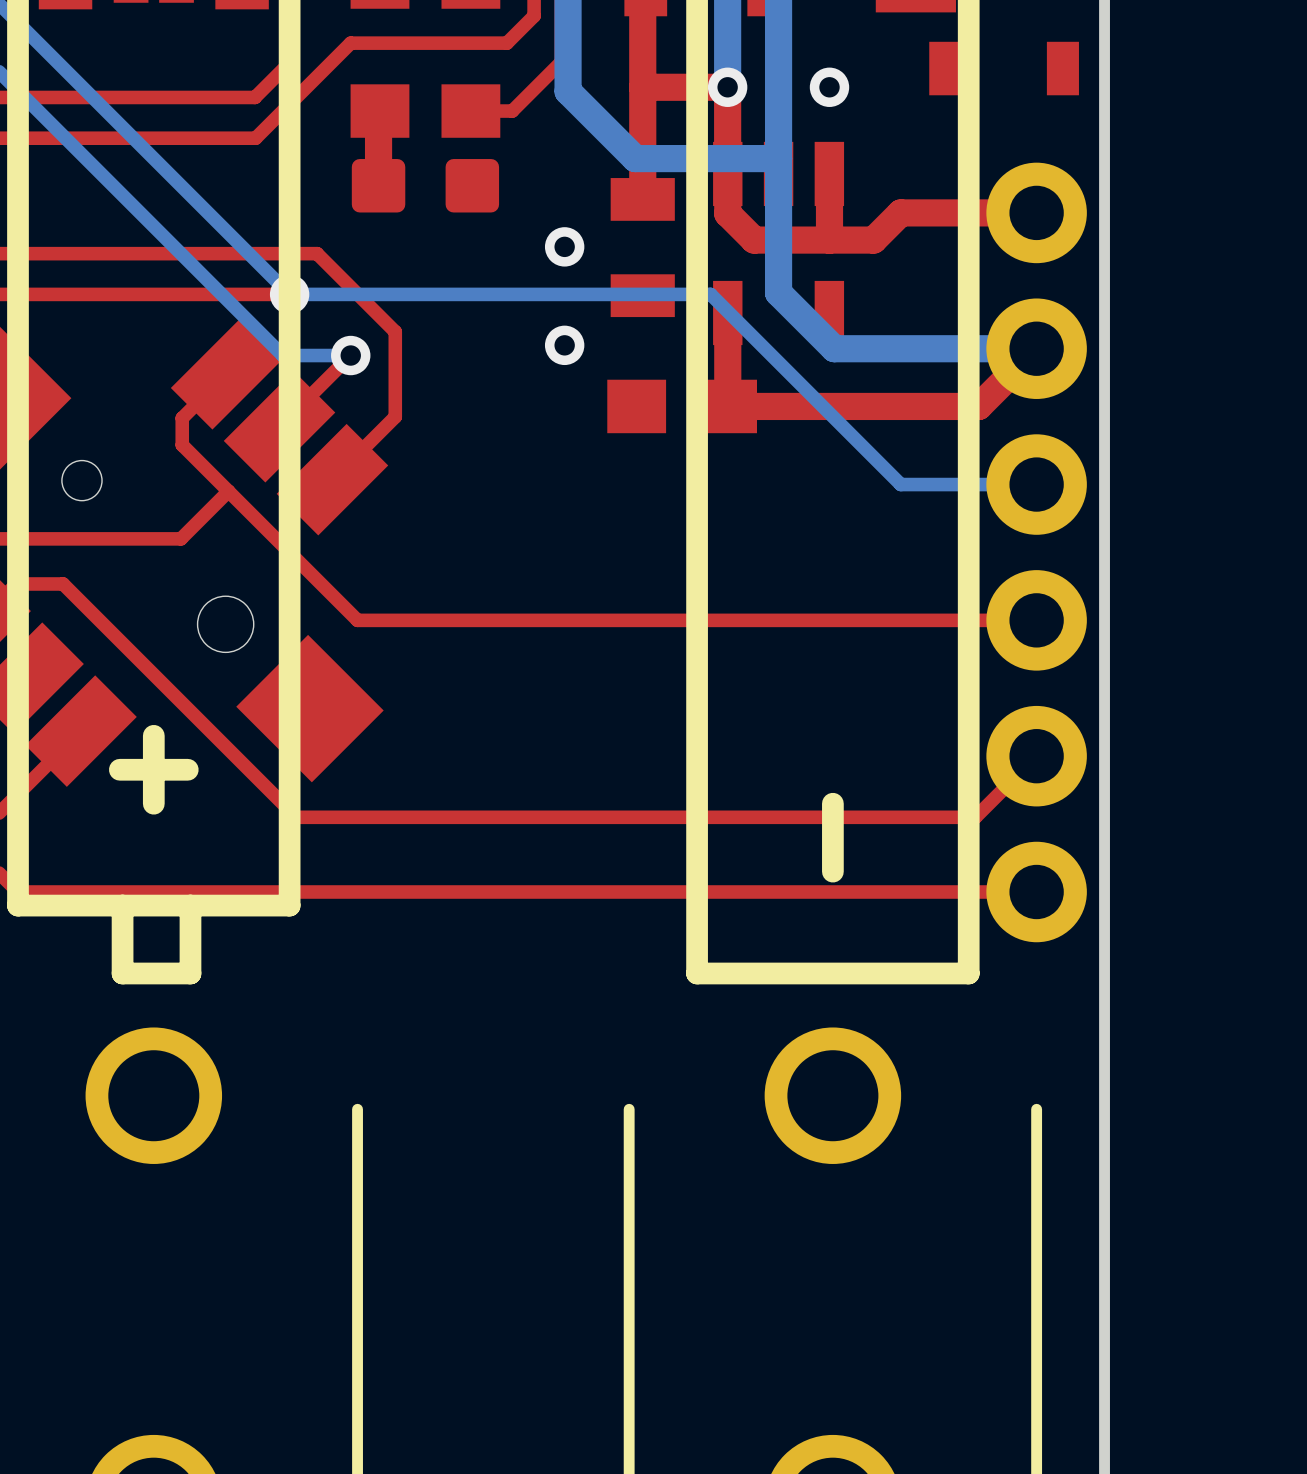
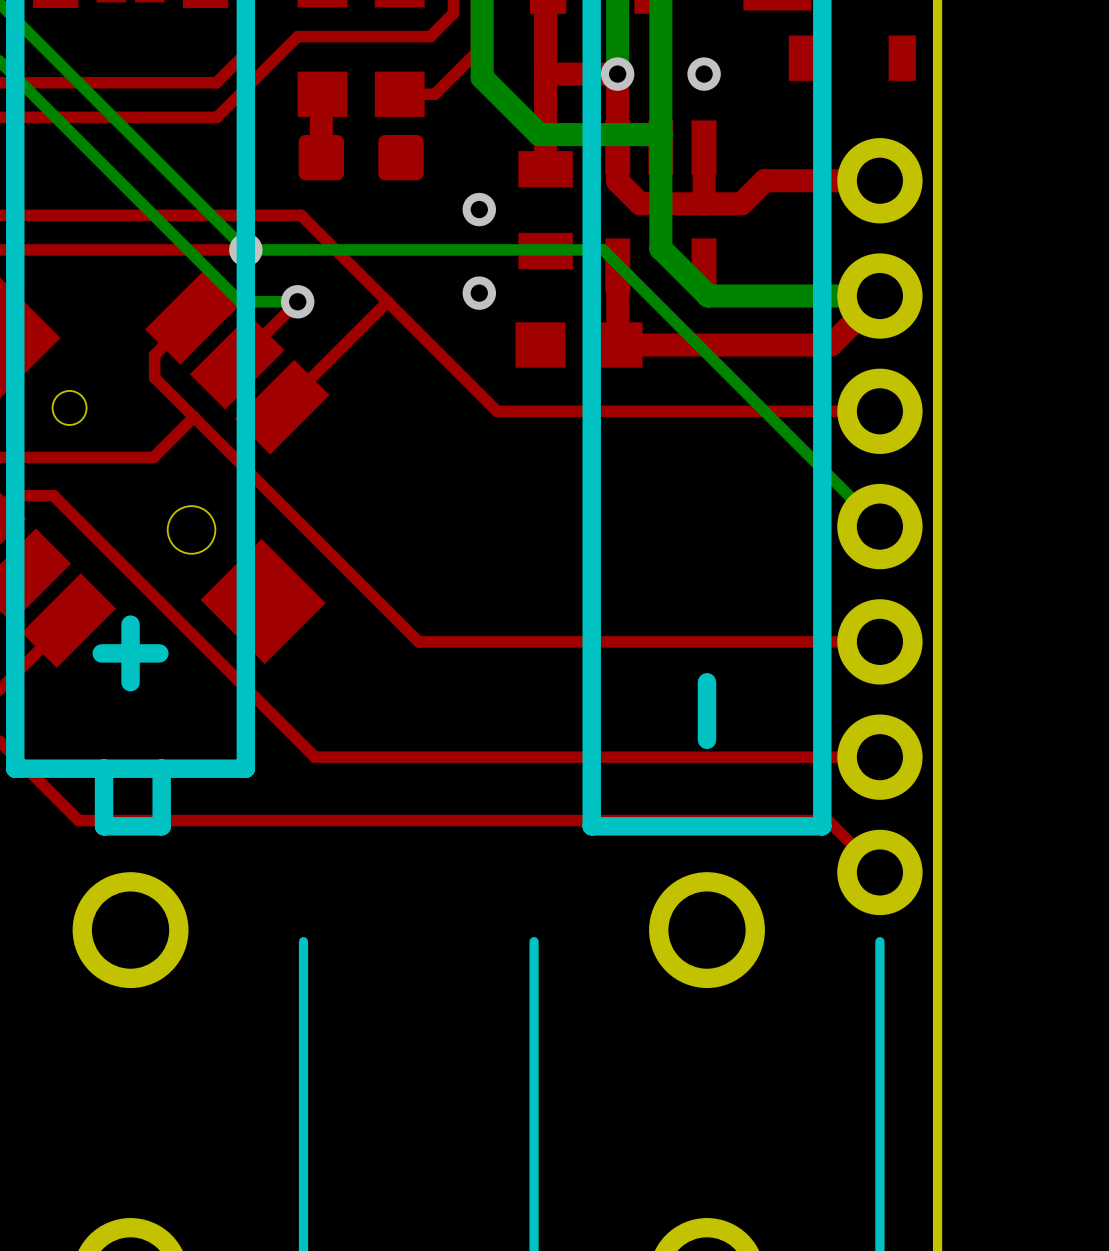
top track: (317, 253) (395, 331) (395, 416) -> (387, 301) (335, 353)
top track: none -> (269, 215) (301, 215) (497, 411) (879, 411)
bottom track: (1036, 484) (900, 484) -> (879, 526) (764, 411)
part: (1036, 552) -> none
top track: (1036, 620) (357, 620) -> (879, 641) (418, 641) (303, 526)
part: none -> (879, 526)
top track: (1036, 756) (975, 817) (296, 817) -> none
top track: none -> (15, 757) (78, 820) (828, 820) (879, 872)
top track: (371, 892) (17, 892) -> (315, 757) (251, 693)

